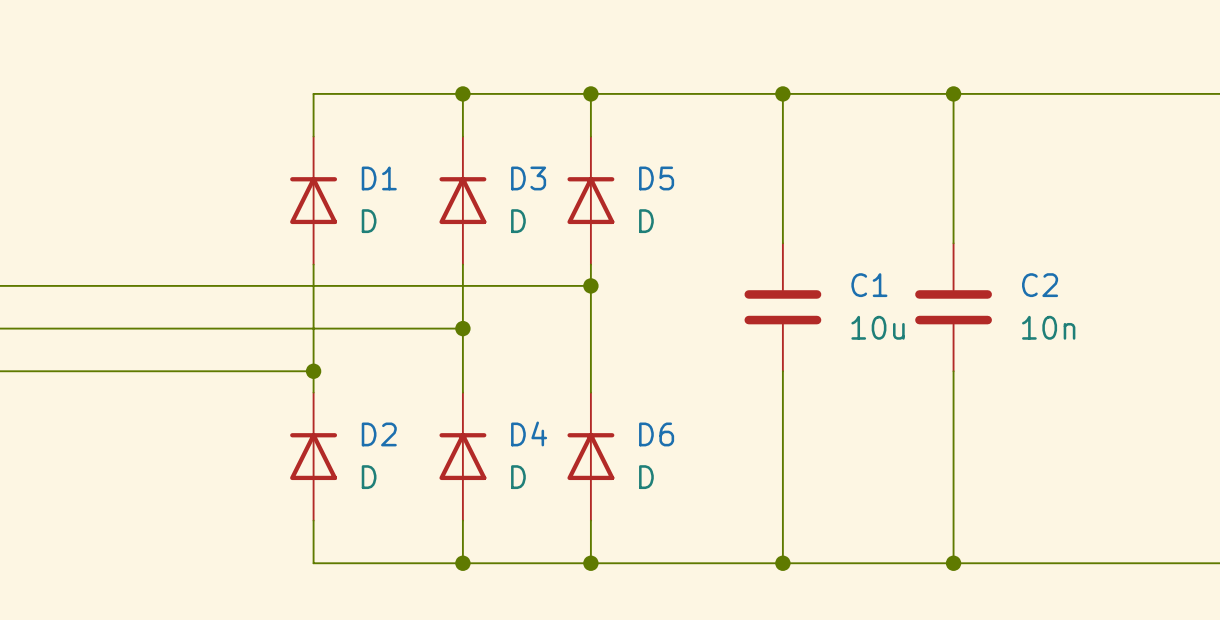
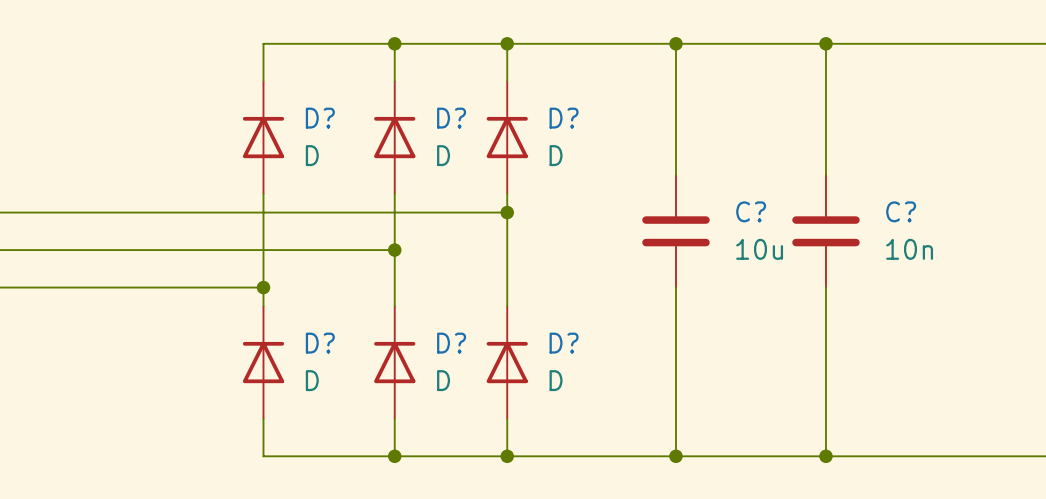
D1 name: D1 (379, 178) -> D? (320, 118)
D3 name: D3 (528, 178) -> D? (451, 118)
D5 name: D5 (656, 178) -> D? (564, 118)
C1 name: C1 (869, 285) -> C? (751, 211)
C2 name: C2 (1040, 285) -> C? (901, 211)
D4 name: D4 (529, 433) -> D? (451, 343)
D2 name: D2 (379, 434) -> D? (320, 343)
D6 name: D6 (656, 434) -> D? (564, 343)

